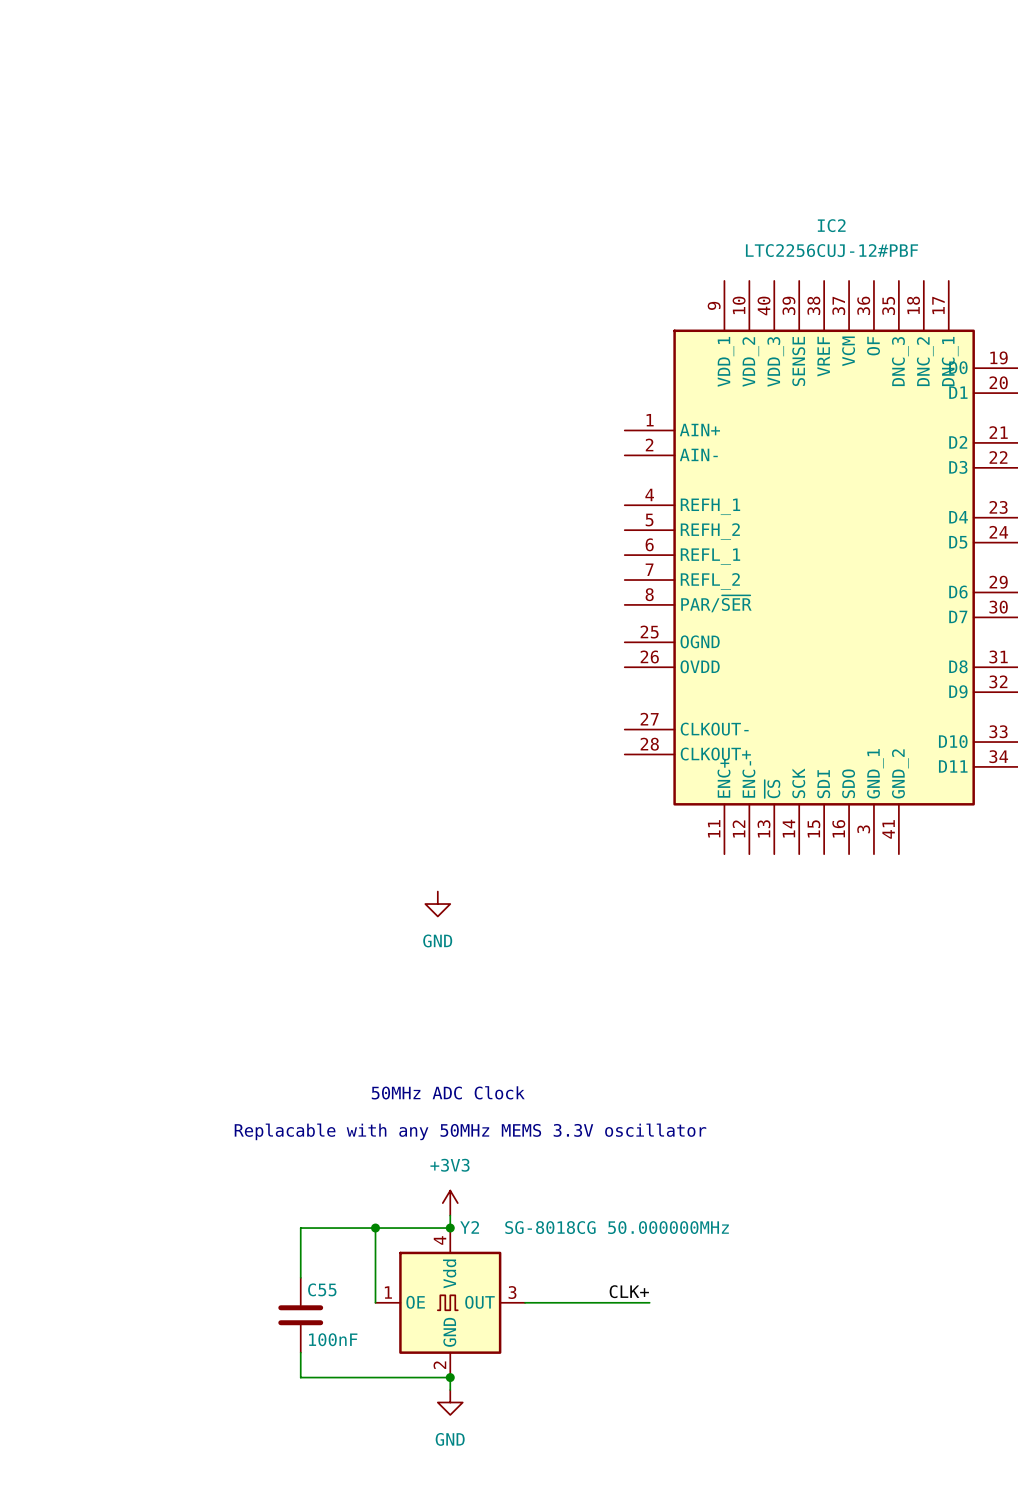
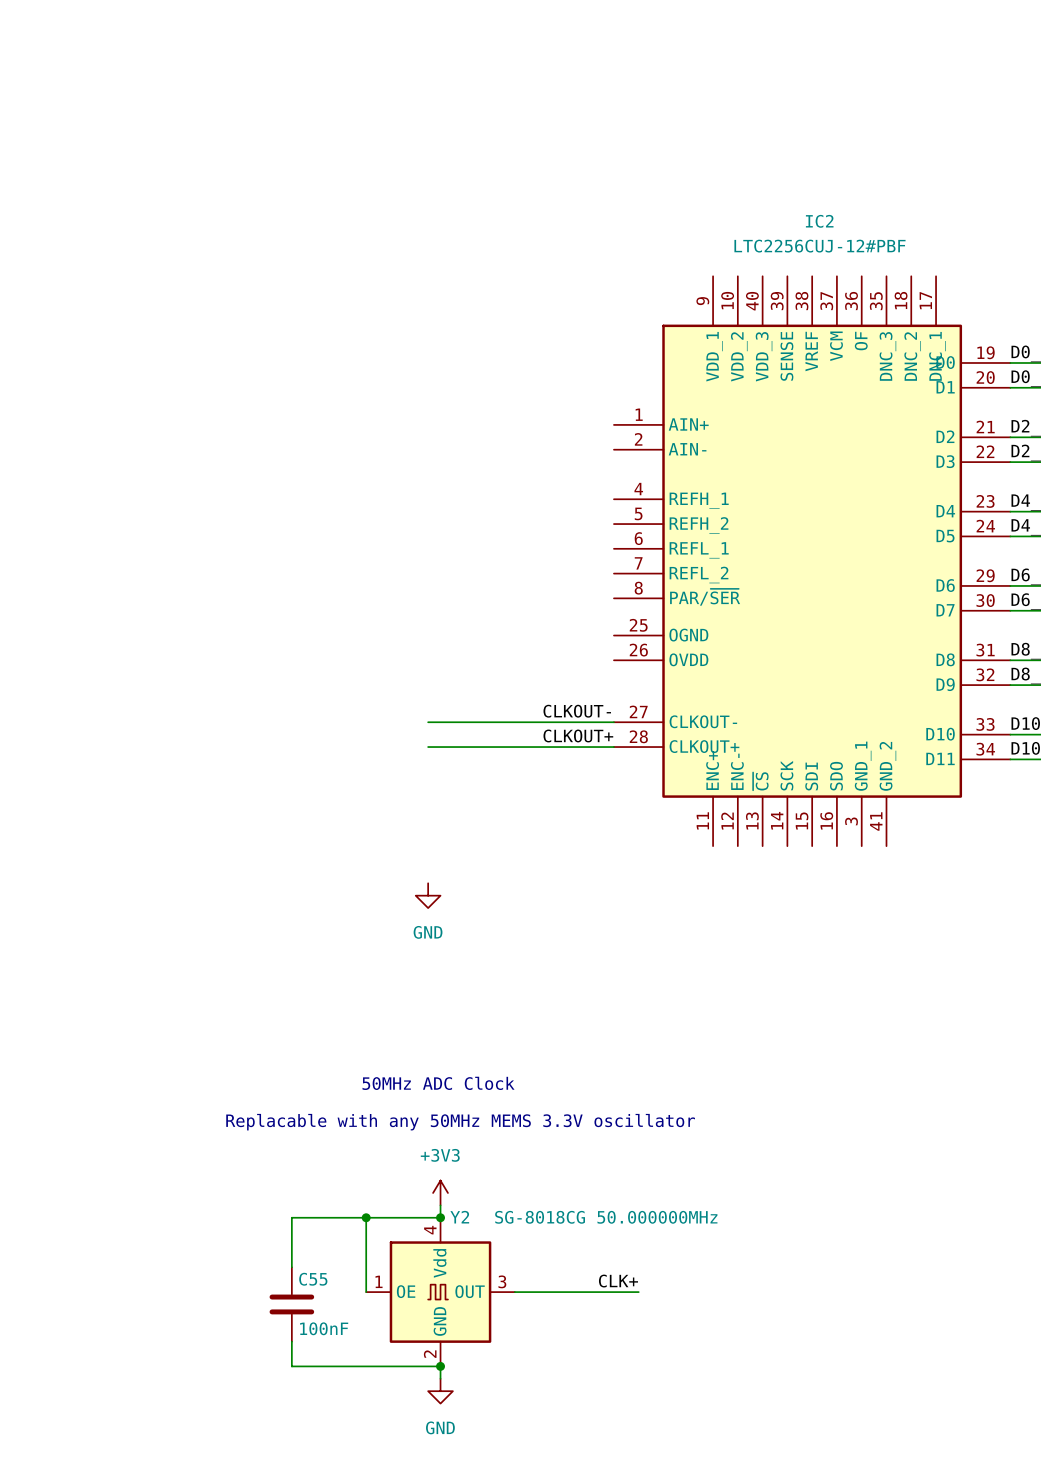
label: none -> CLKOUT- (577, 711)
wire: none -> (428, 722) (613, 722)
label: none -> CLKOUT+ (578, 735)
wire: none -> (428, 747) (613, 747)

